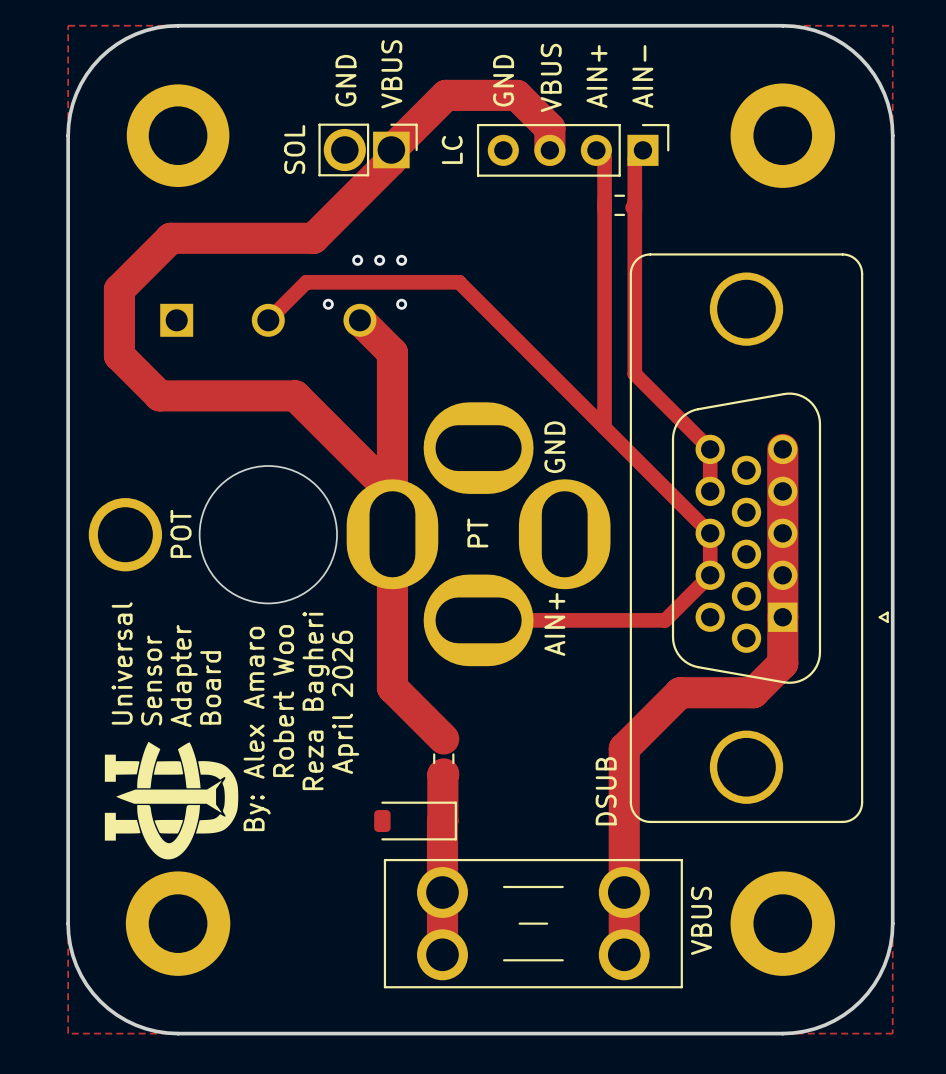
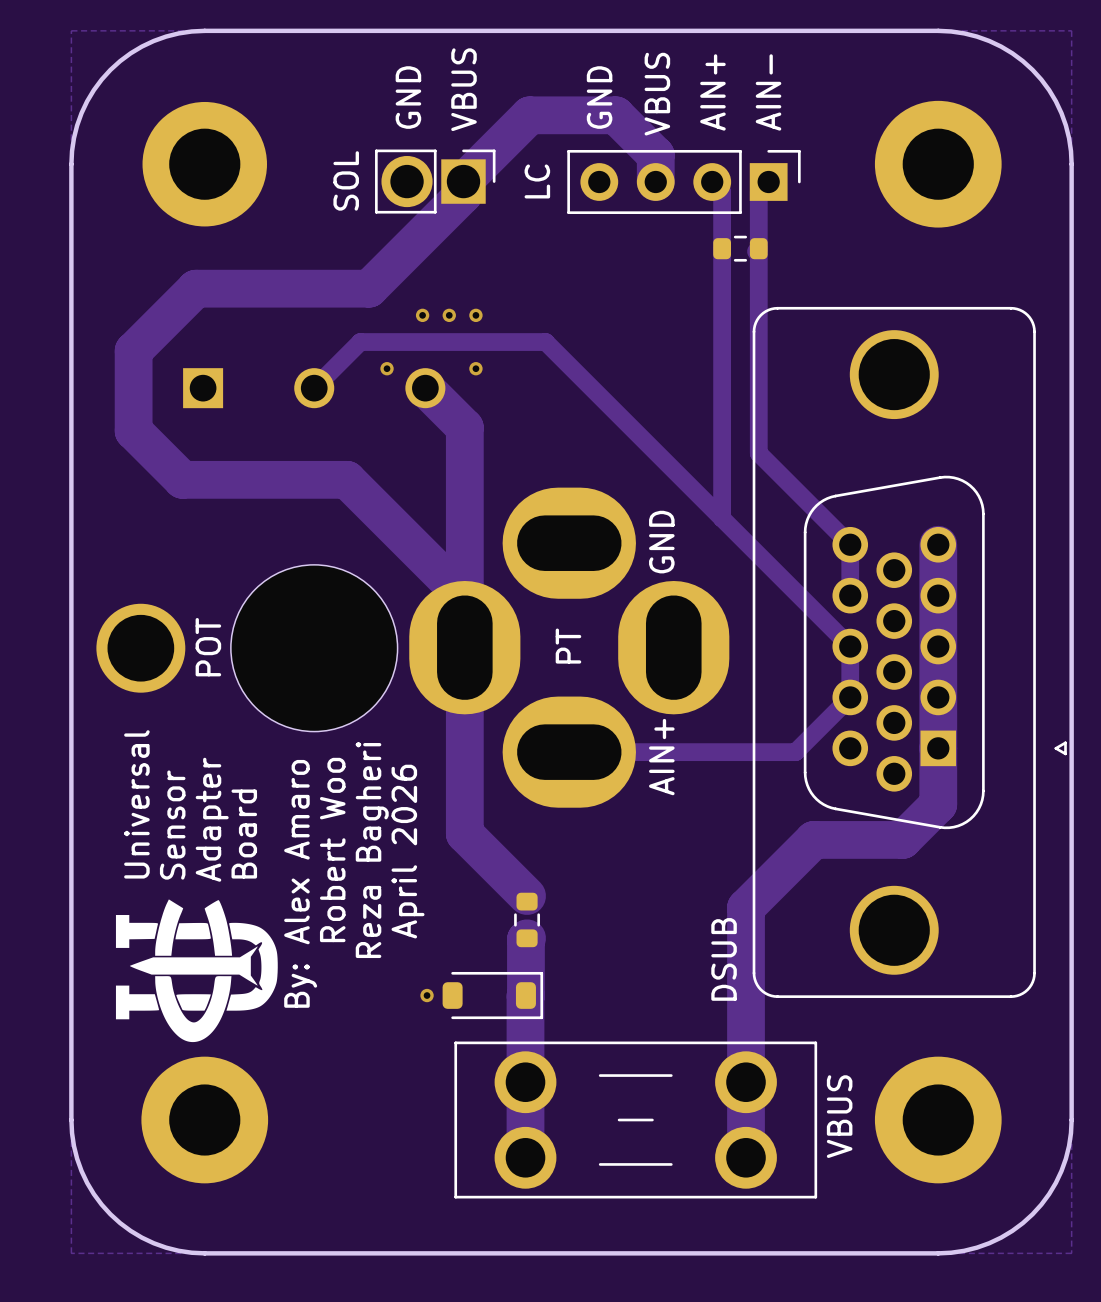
via: none -> (427, 995)

